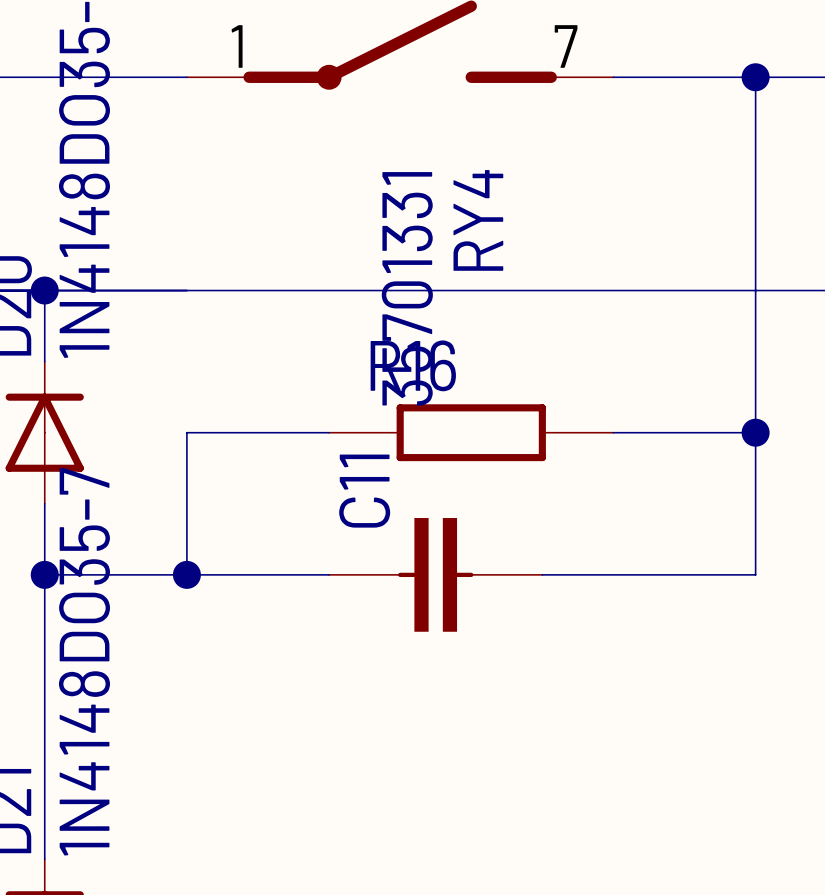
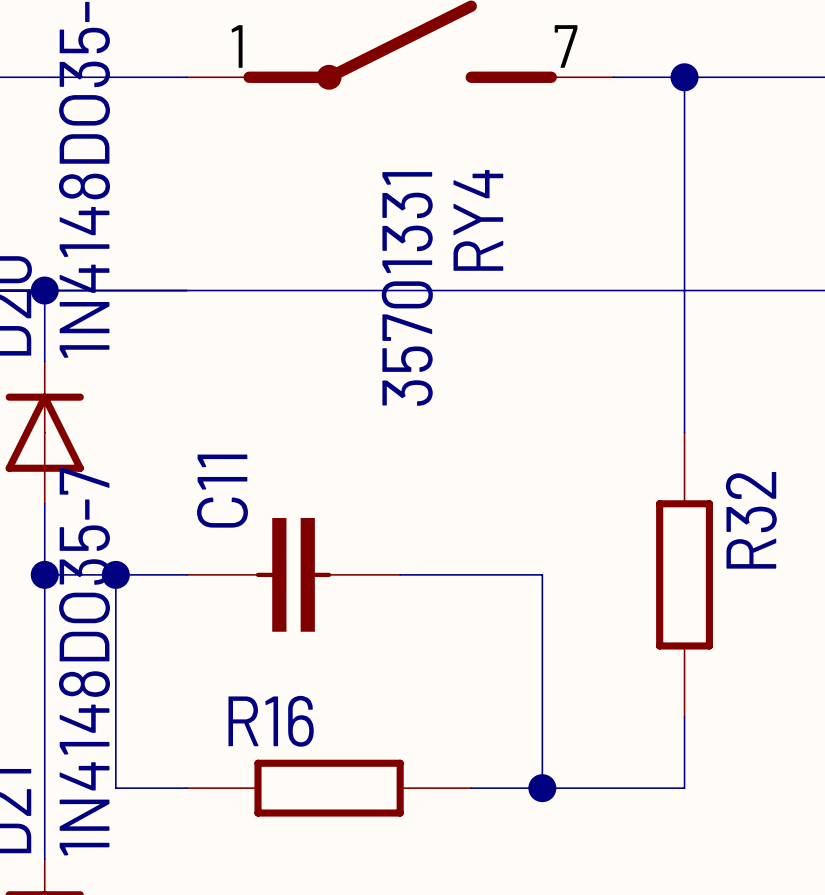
wire: none -> (684, 77) (684, 432)
wire: (755, 77) (755, 574) (542, 574) -> none
junction position: (755, 77) -> (684, 77)
wire: (329, 432) (186, 432) (186, 574) (329, 574) -> none
R16 position: (471, 432) -> (329, 788)
wire: (613, 432) (755, 432) -> none
junction: (755, 432) -> none
wire: none -> (115, 574) (115, 788) (186, 788)
junction position: (186, 574) -> (115, 574)
wire: none -> (400, 574) (542, 574) (542, 788)
C11 position: (435, 574) -> (293, 574)
R32: none -> (684, 574)
wire: none -> (684, 717) (684, 788) (471, 788)
junction: none -> (542, 788)

